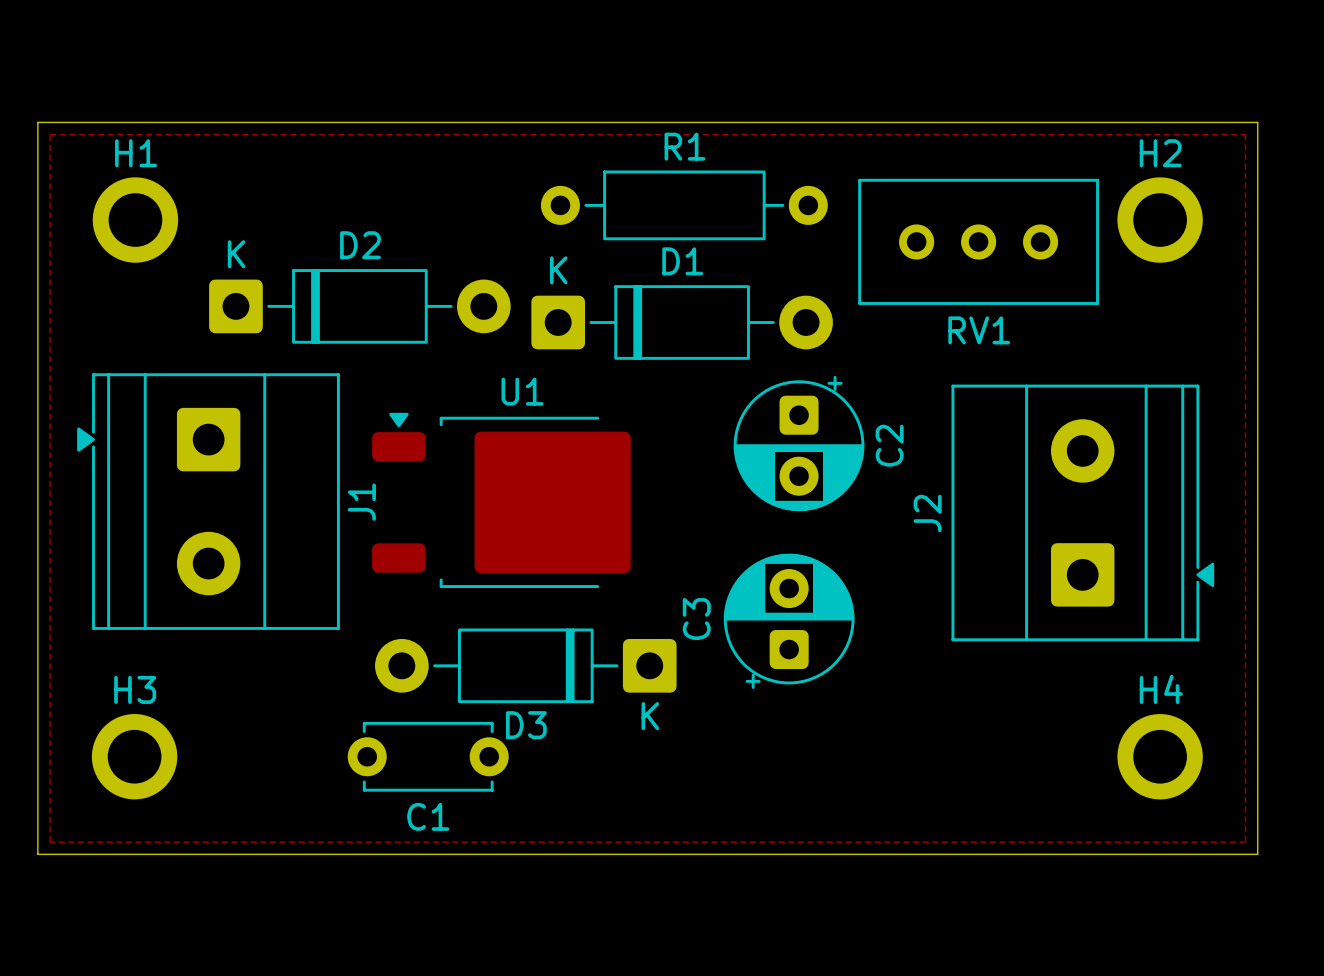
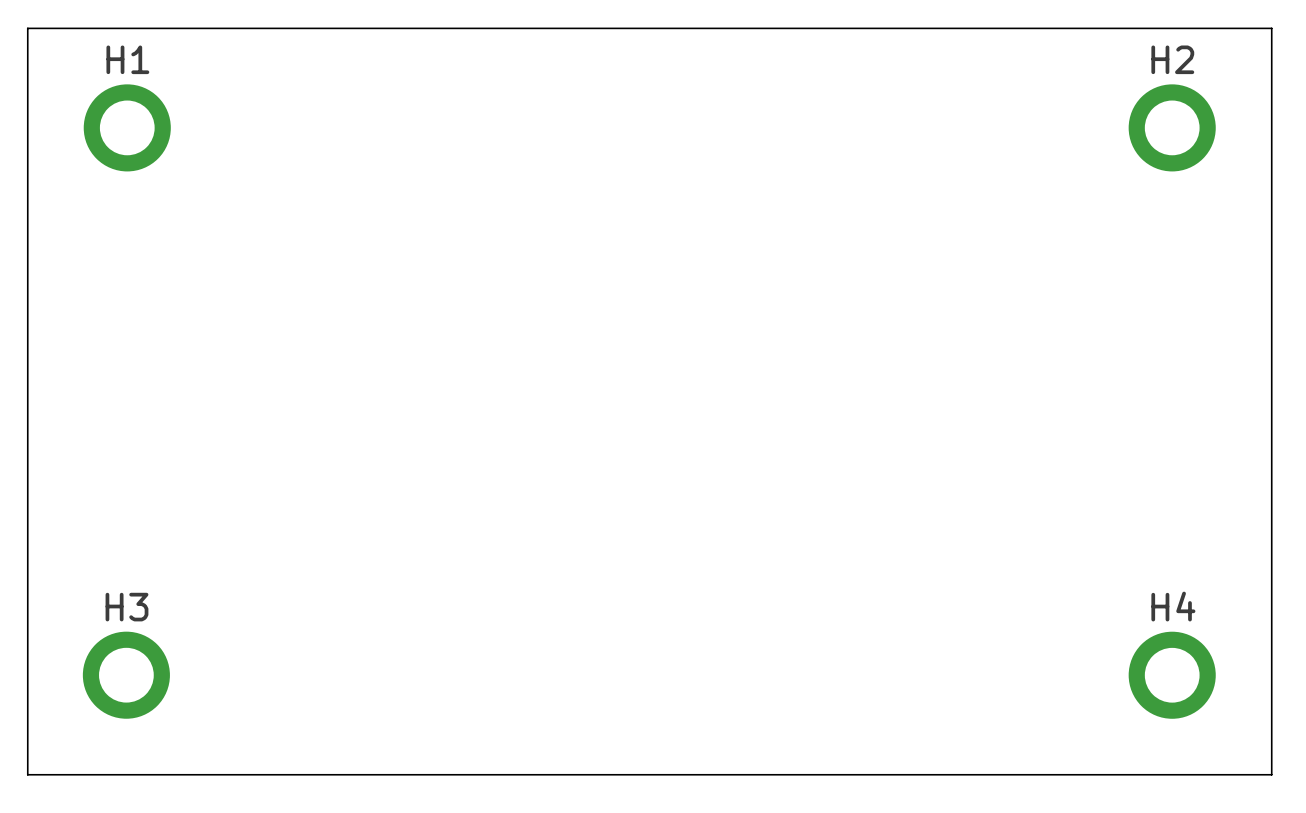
top zone outline: (50, 134) (1245, 134) (1245, 842) (50, 842) (50, 134) -> none
R1: (684, 205) -> none
RV1: (978, 241) -> none
D2: (359, 306) -> none
D1: (682, 322) -> none
C2: (799, 443) -> none
U1: (501, 500) -> none
J1: (208, 501) -> none
J2: (1082, 512) -> none
C3: (789, 621) -> none
D3: (525, 665) -> none
C1: (428, 756) -> none

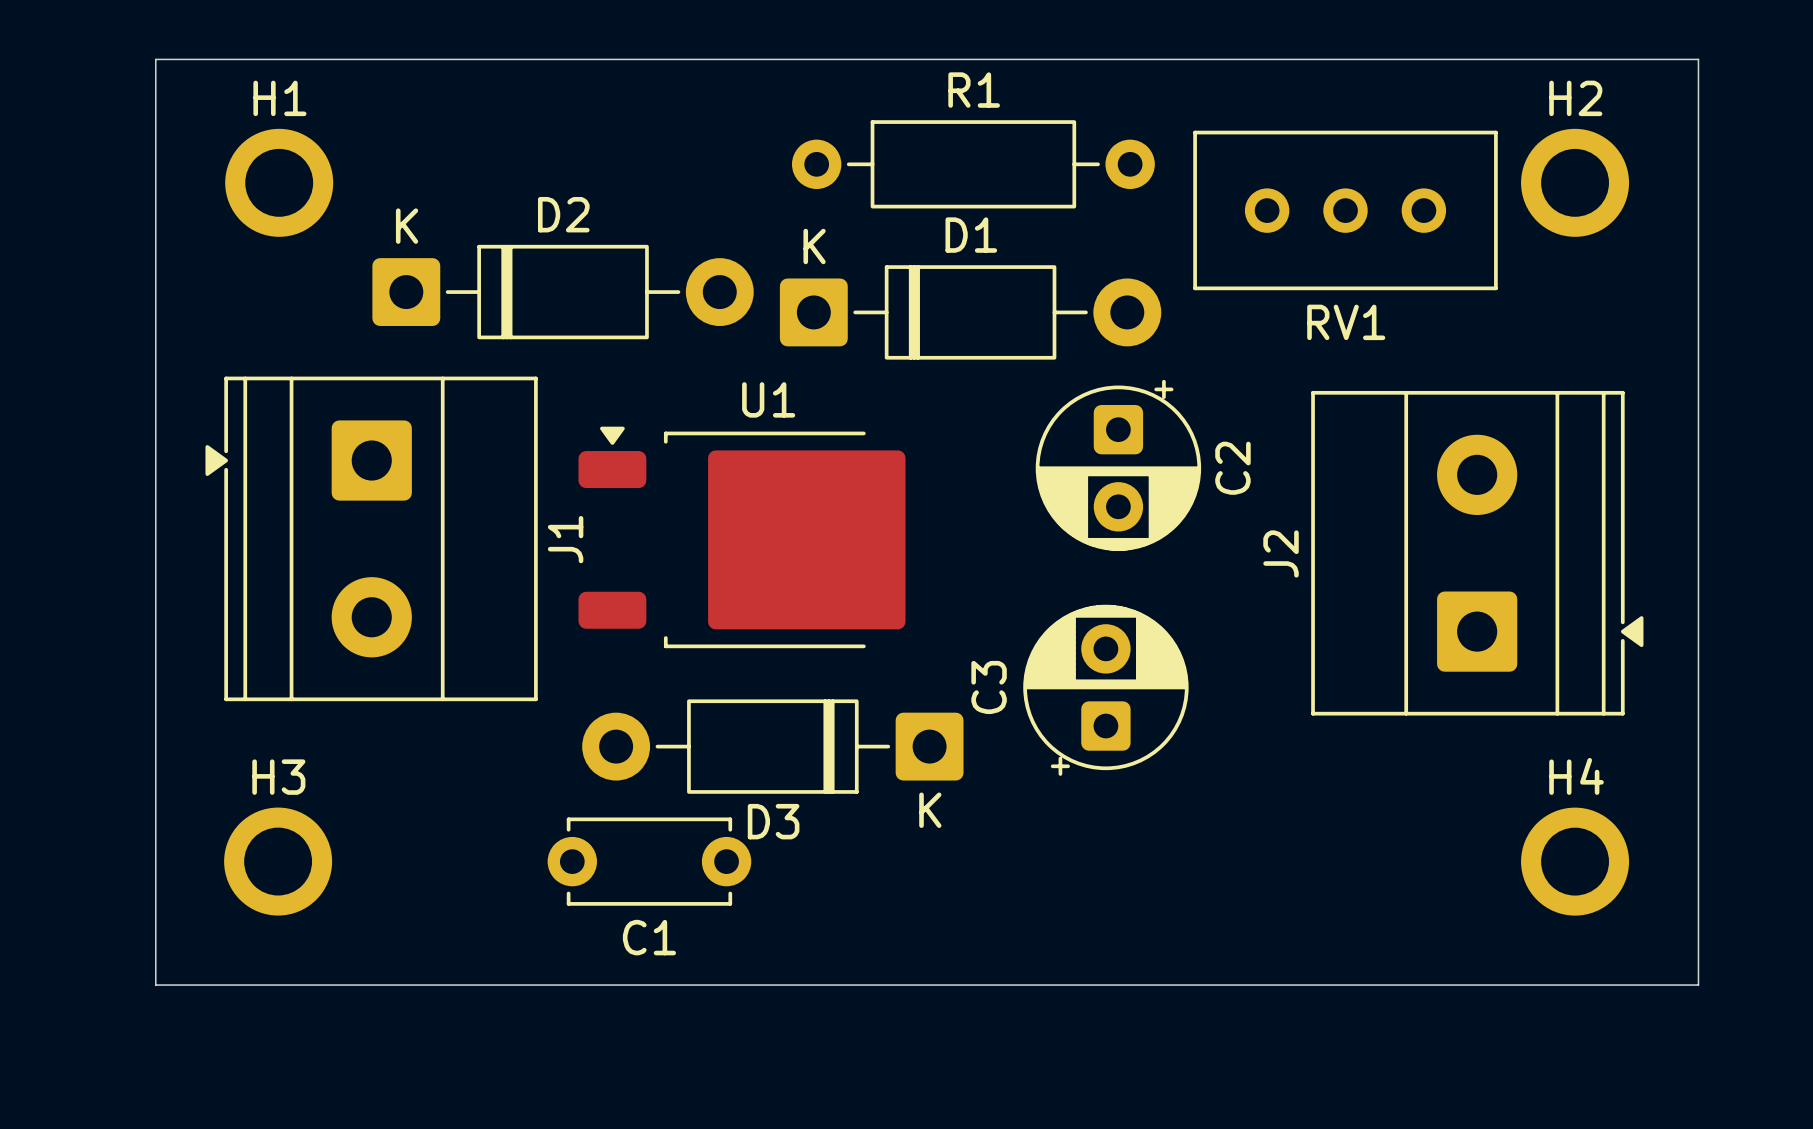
R1: none -> (973, 164)
RV1: none -> (1345, 210)
D2: none -> (563, 292)
D1: none -> (970, 312)
C2: none -> (1118, 465)
U1: none -> (742, 537)
J1: none -> (371, 538)
J2: none -> (1477, 553)
C3: none -> (1105, 690)
D3: none -> (772, 746)
C1: none -> (649, 861)

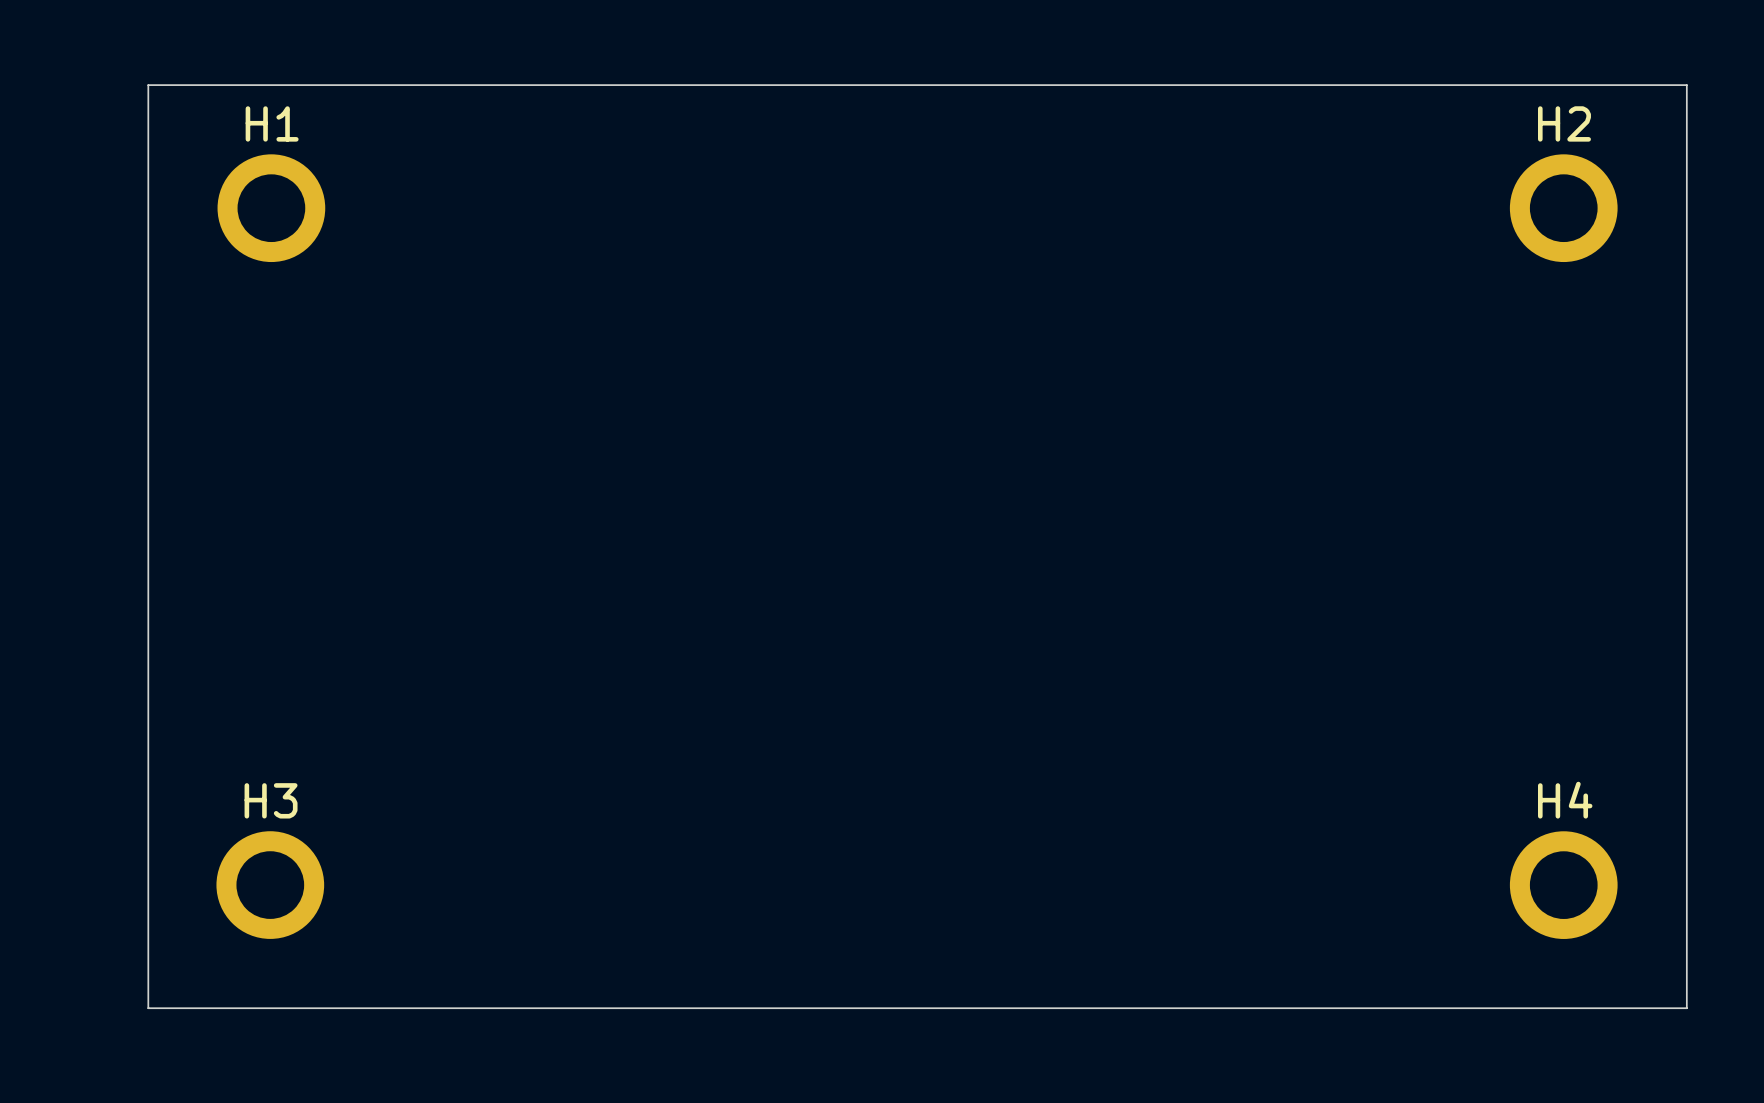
R1: (973, 164) -> none
RV1: (1345, 210) -> none
D2: (563, 292) -> none
D1: (970, 312) -> none
C2: (1118, 465) -> none
U1: (742, 537) -> none
J1: (371, 538) -> none
J2: (1477, 553) -> none
C3: (1105, 690) -> none
D3: (772, 746) -> none
C1: (649, 861) -> none

